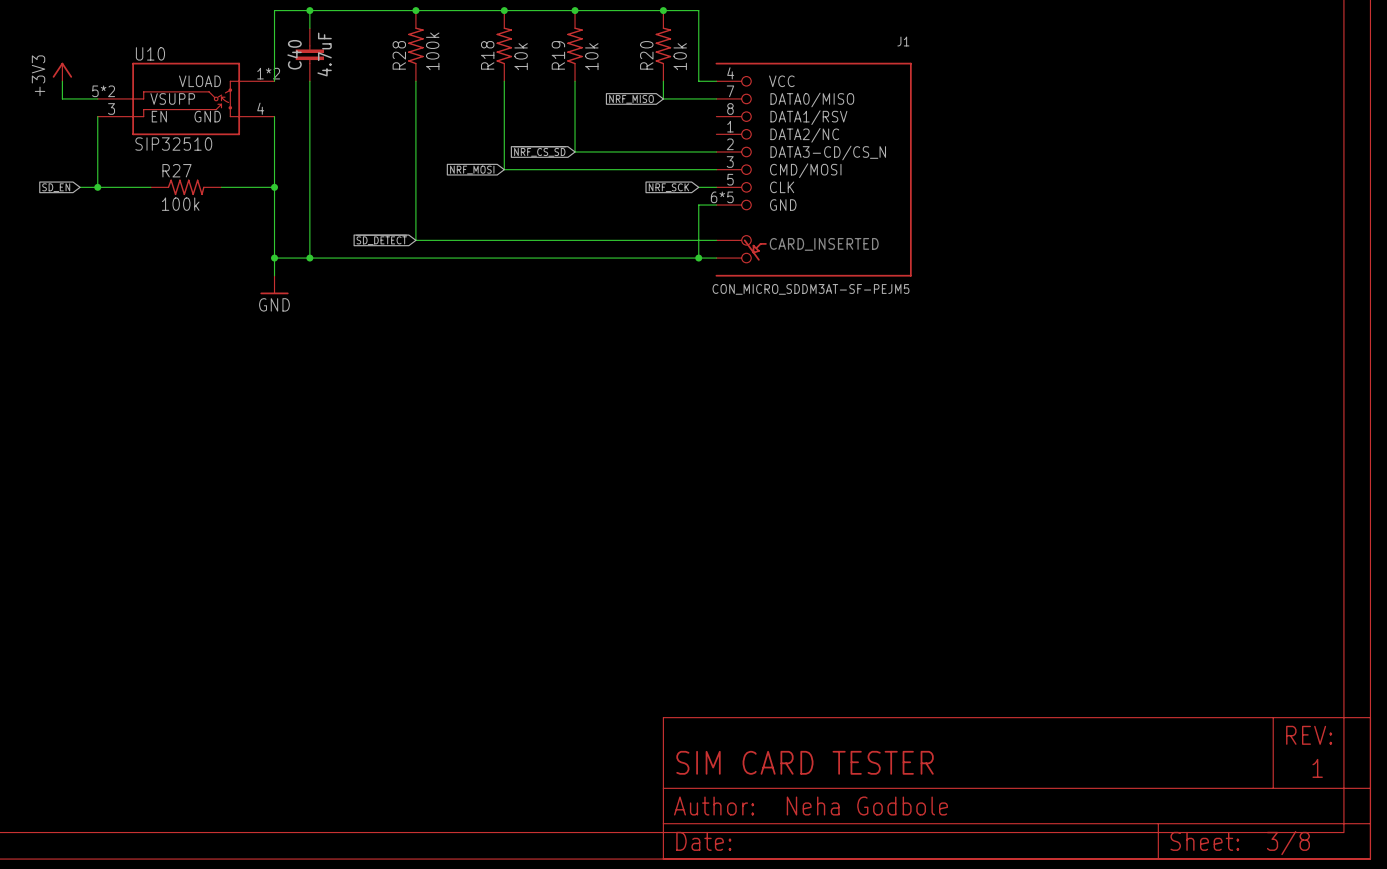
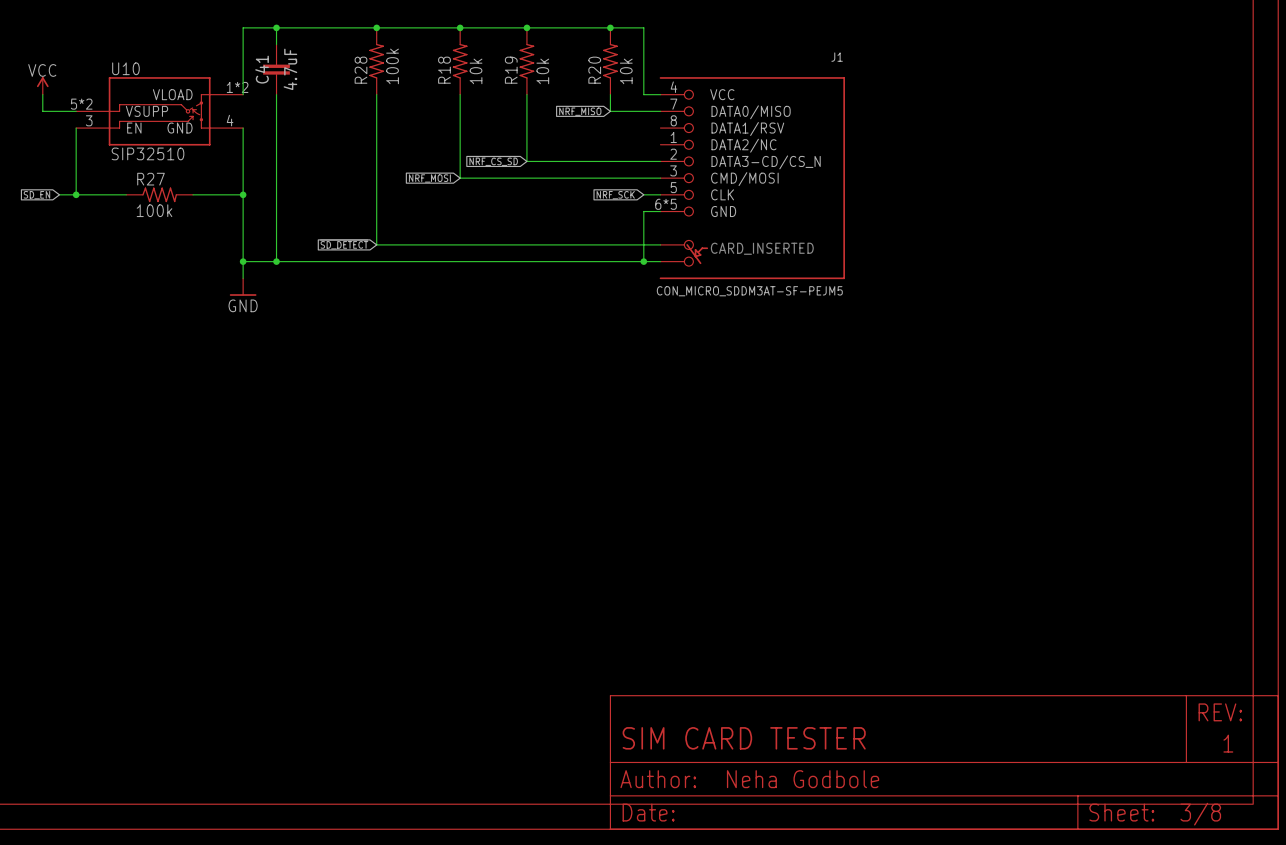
C40 name: C40 (294, 54) -> C41 (262, 69)
power symbol: +3V3 (62, 72) -> VCC (42, 85)

